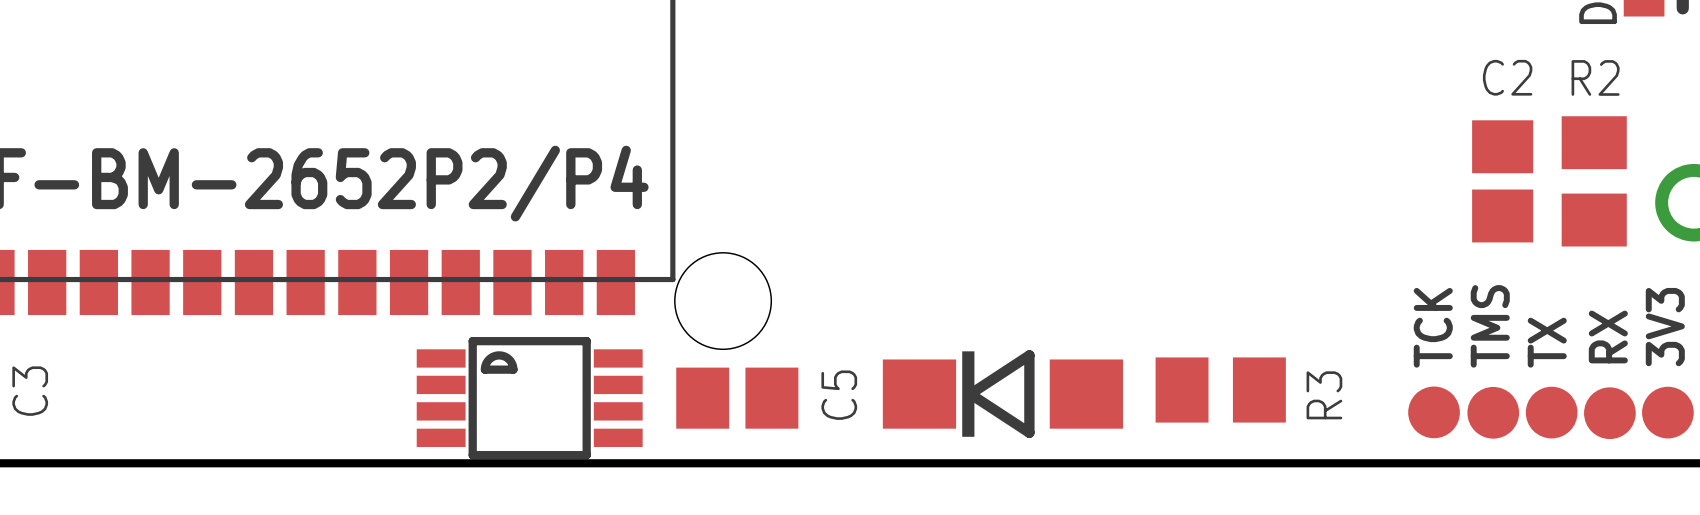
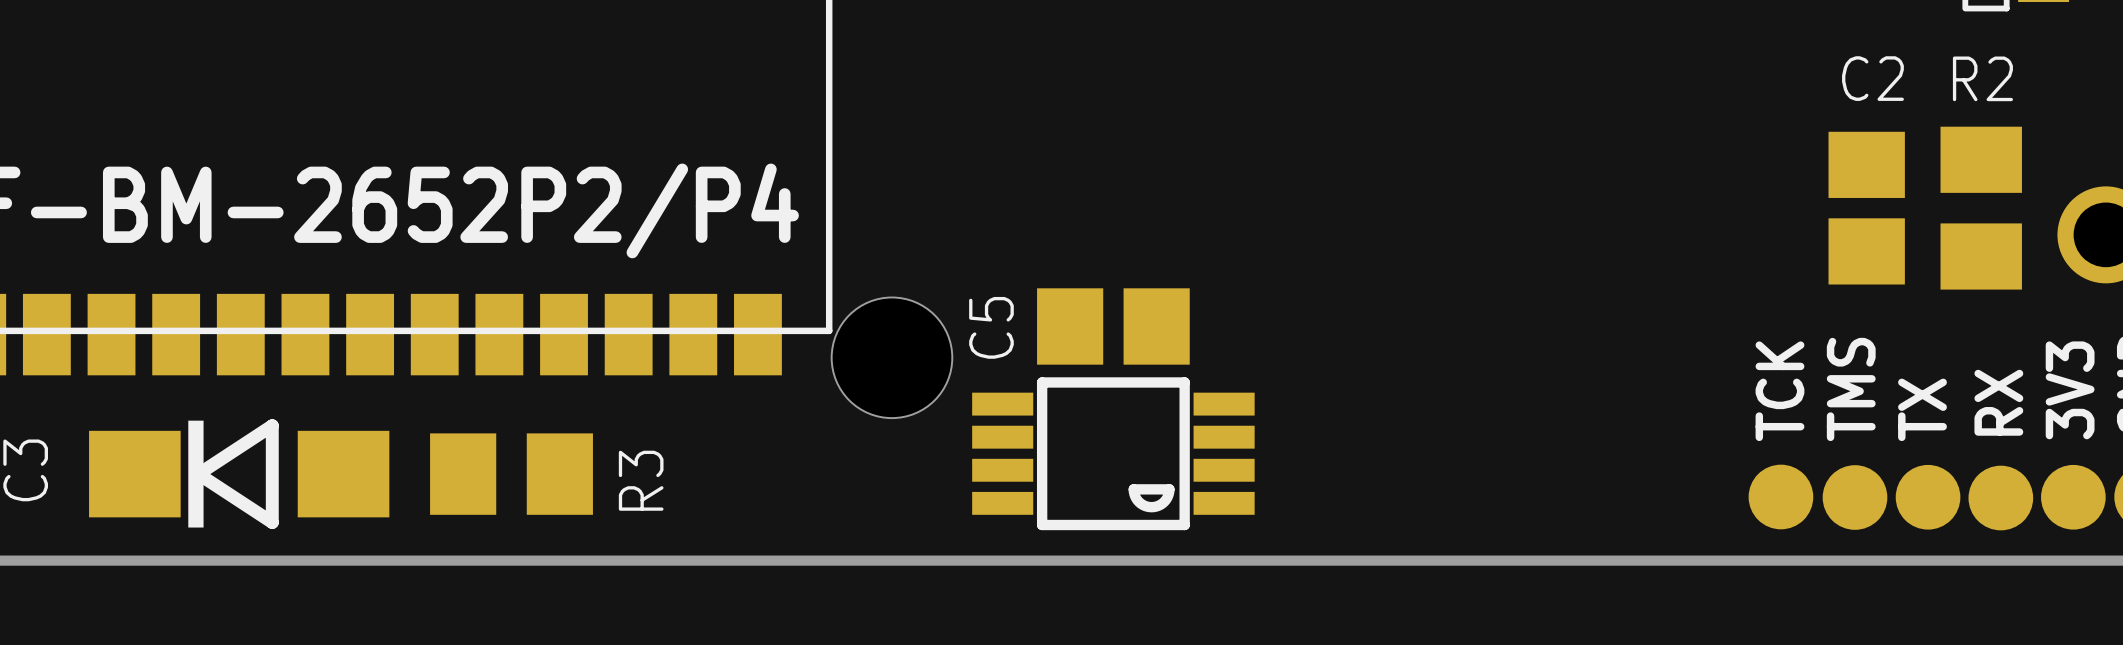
R3 position: (1220, 390) -> (511, 474)
part position: (1002, 394) -> (239, 474)
C5 name position: C5 (839, 395) -> C5 (991, 327)
part rotation: 0° (529, 398) -> 180° (1113, 453)
part position: (529, 398) -> (1113, 453)
C5 position: (737, 398) -> (1113, 326)

